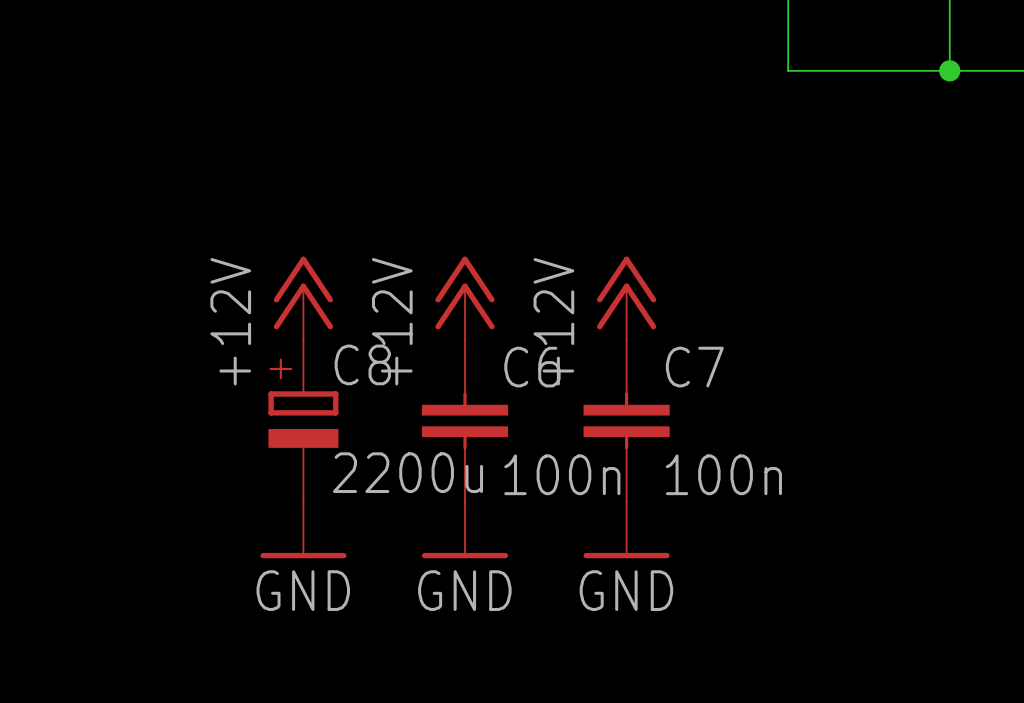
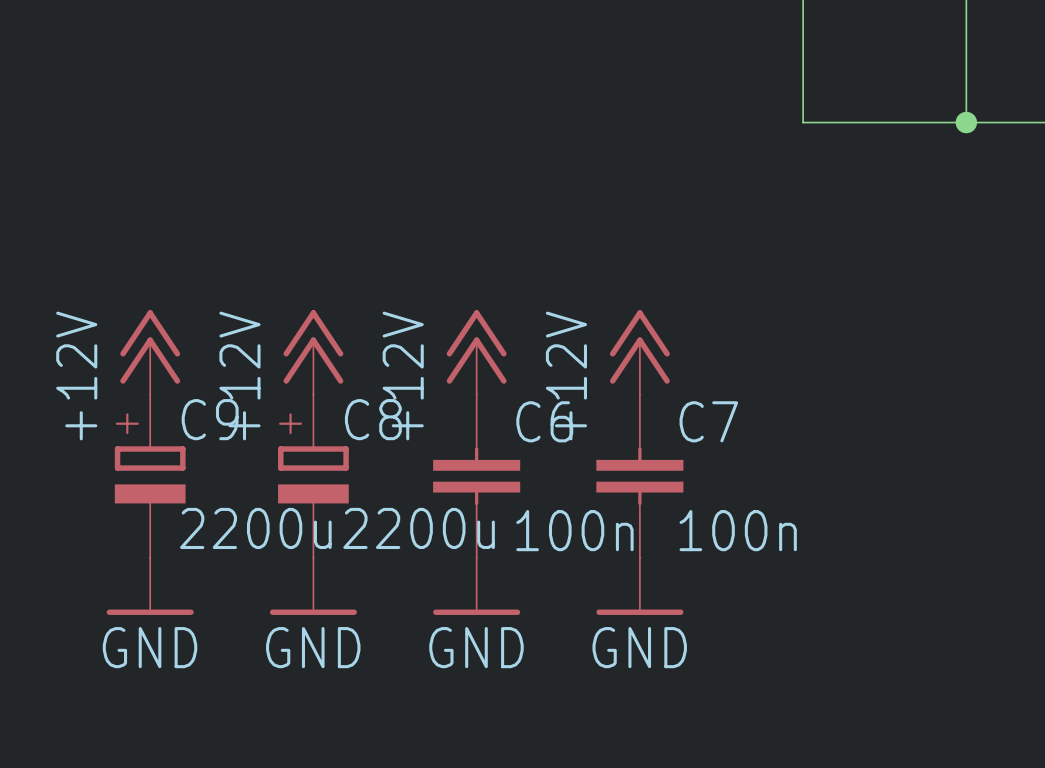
power symbol: none -> +12V (150, 352)
C9: none -> 2200u (150, 476)
power symbol: none -> GND (150, 586)

